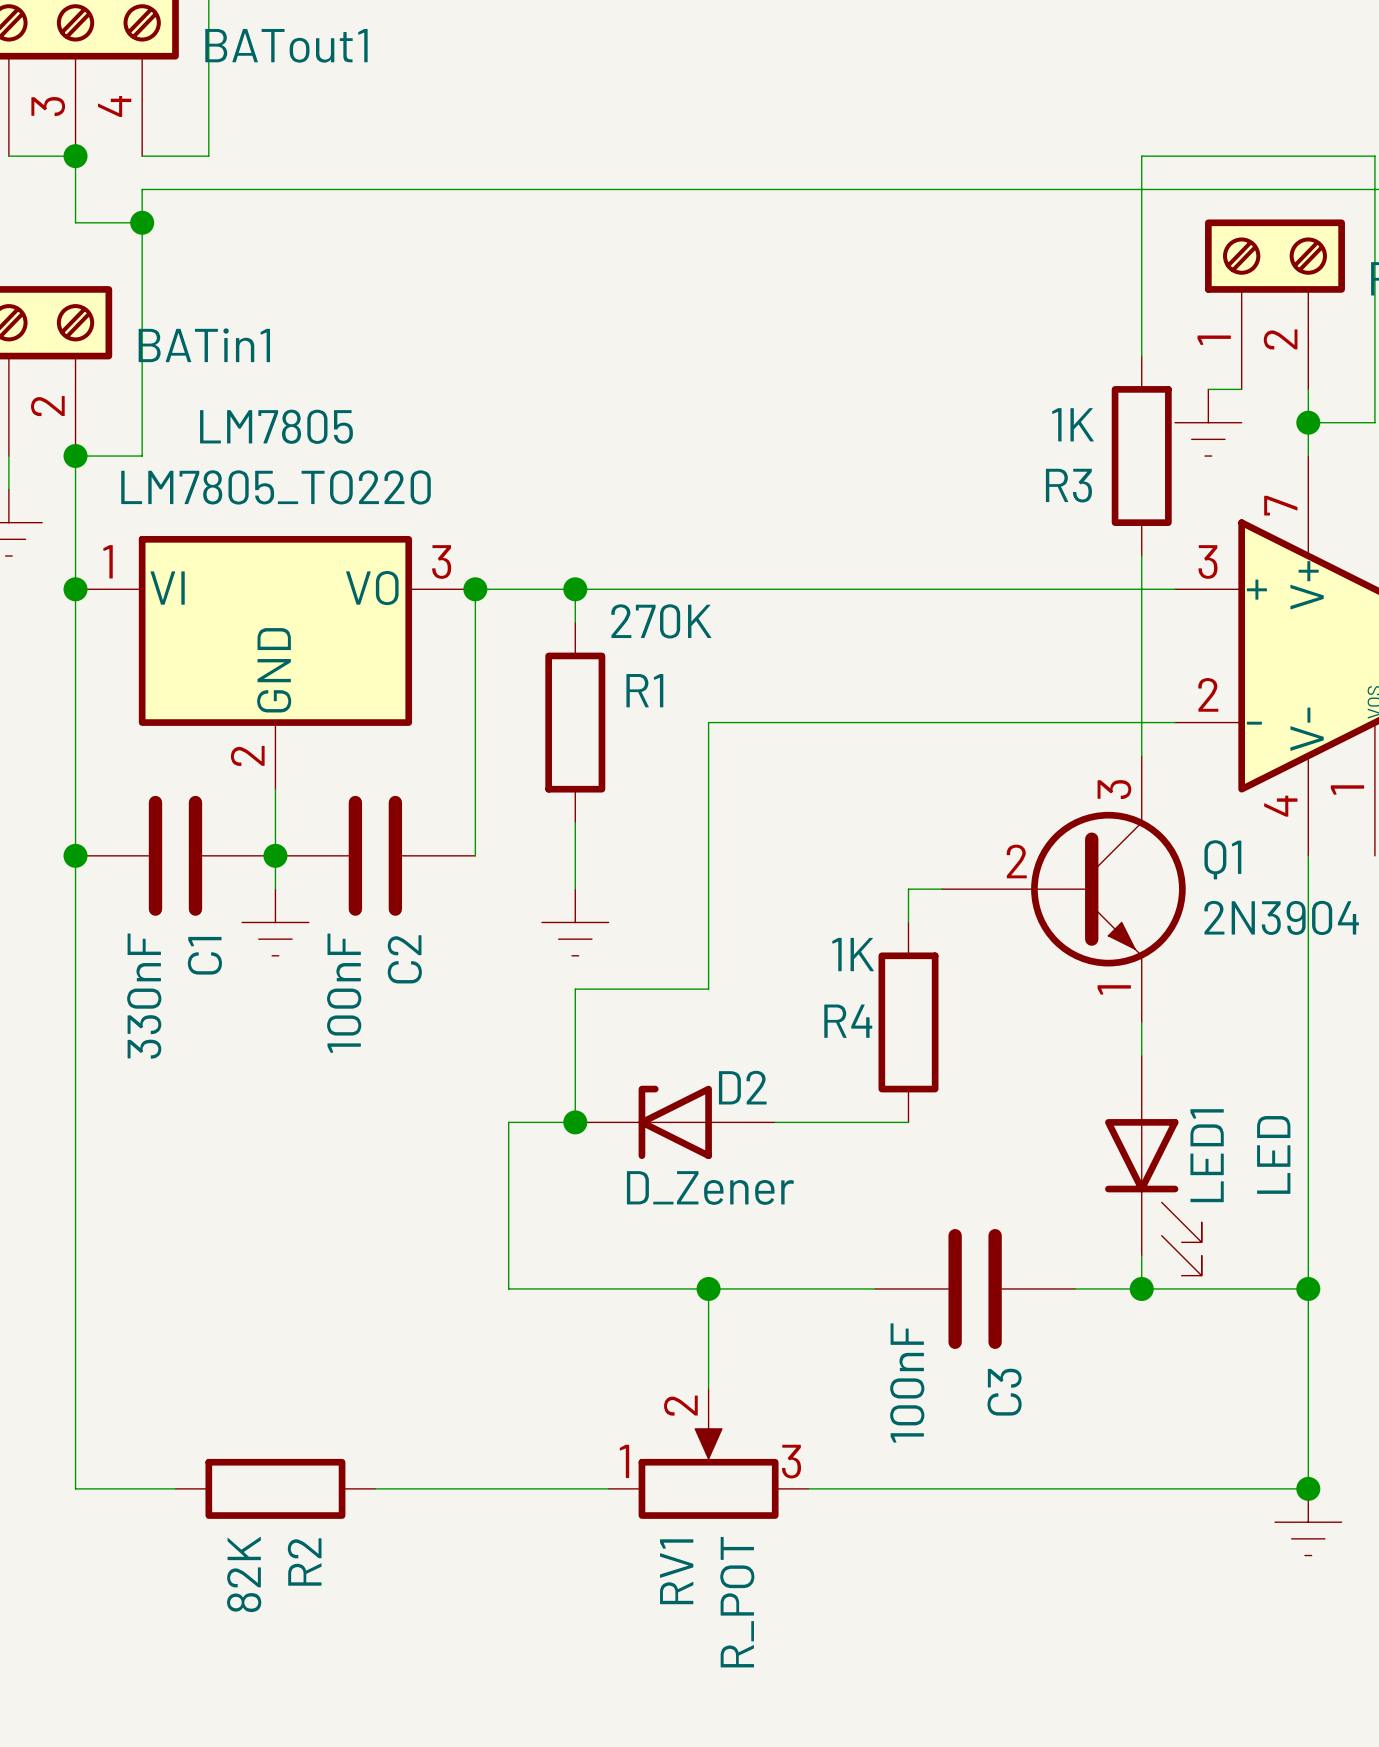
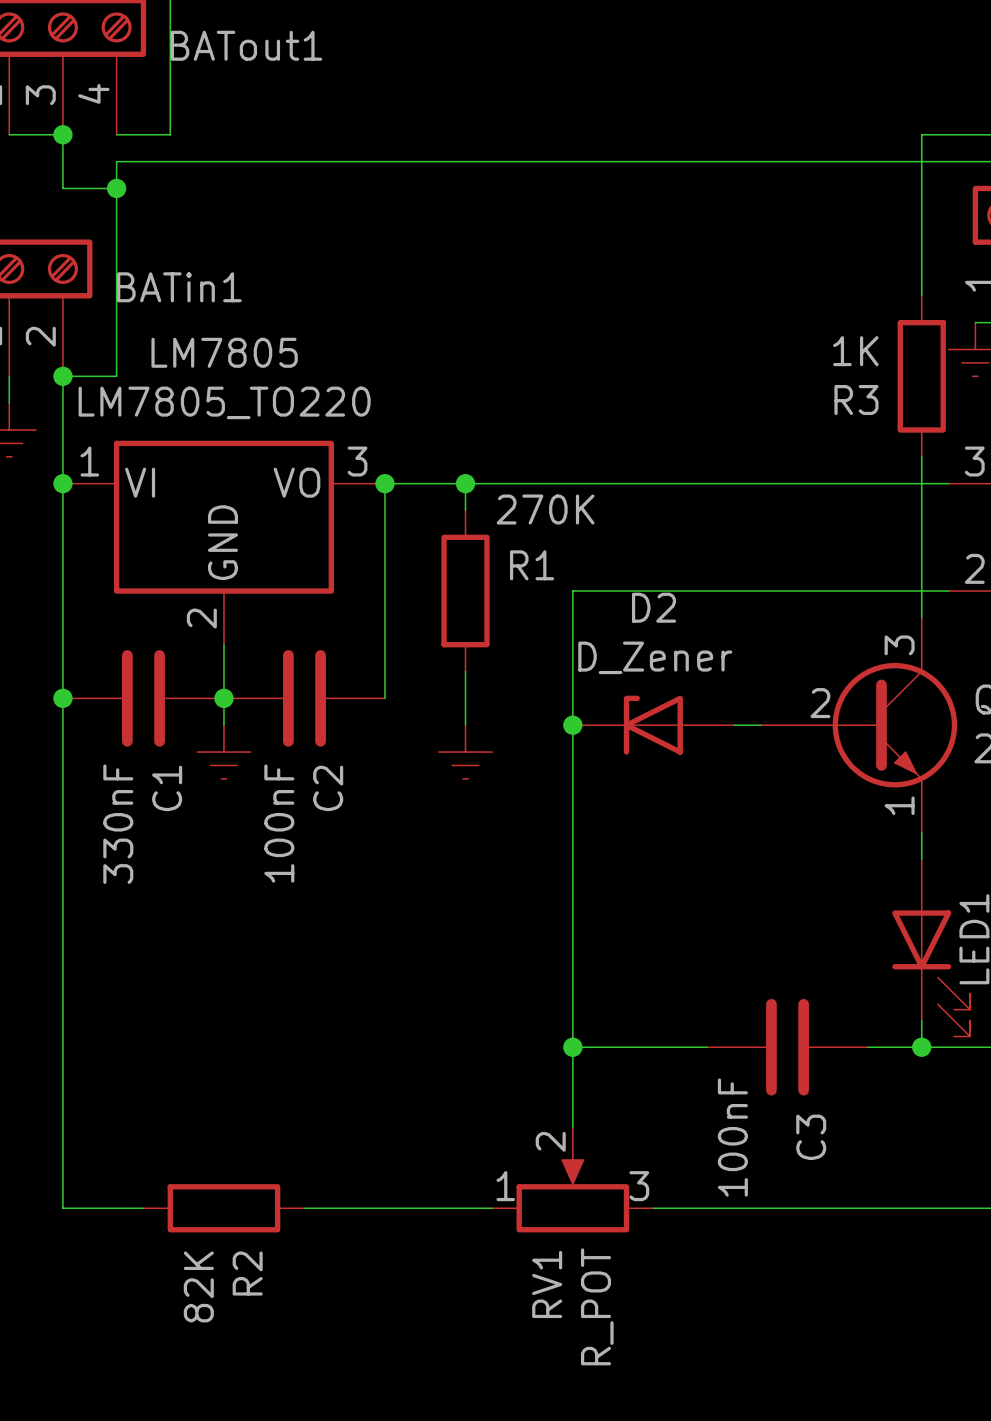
junction: none -> (572, 725)
wire: (908, 889) (908, 922) -> none
wire: (708, 989) (575, 989) (575, 1122) (508, 1122) (508, 1288) (708, 1288) -> (572, 805) (572, 1047)
R4: 1K (908, 1022) -> none
D2 name position: D2 (742, 1087) -> D2 (654, 607)
junction: (575, 1122) -> none
D2 position: (675, 1122) -> (653, 725)
wire: (775, 1122) (908, 1122) -> none
D2 value position: D_Zener (710, 1187) -> D_Zener (655, 657)

